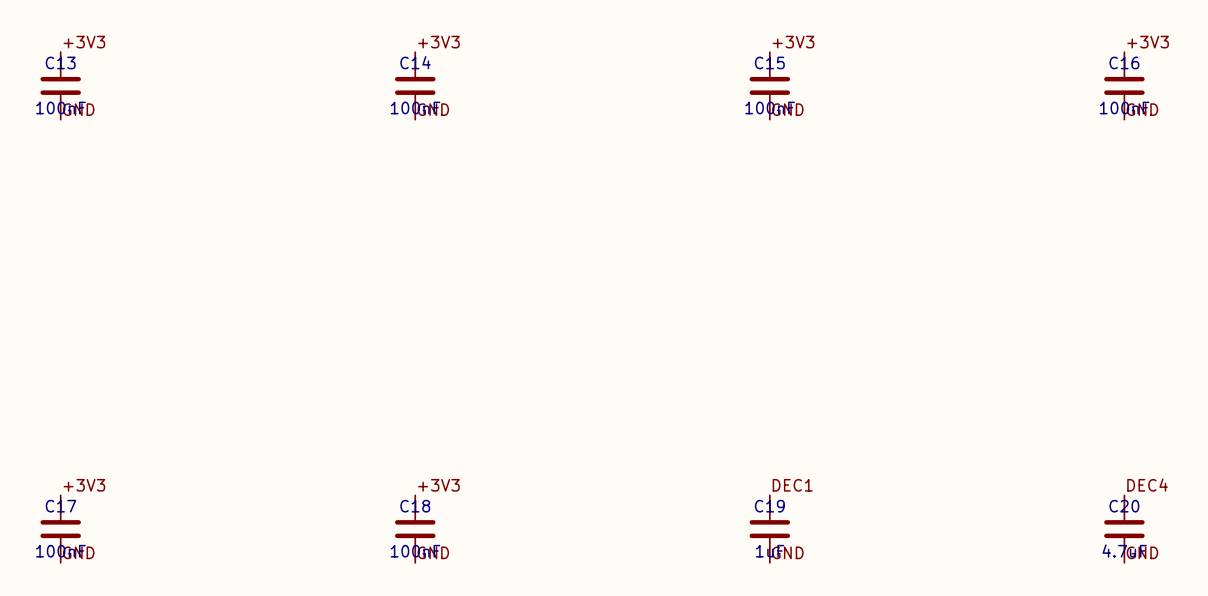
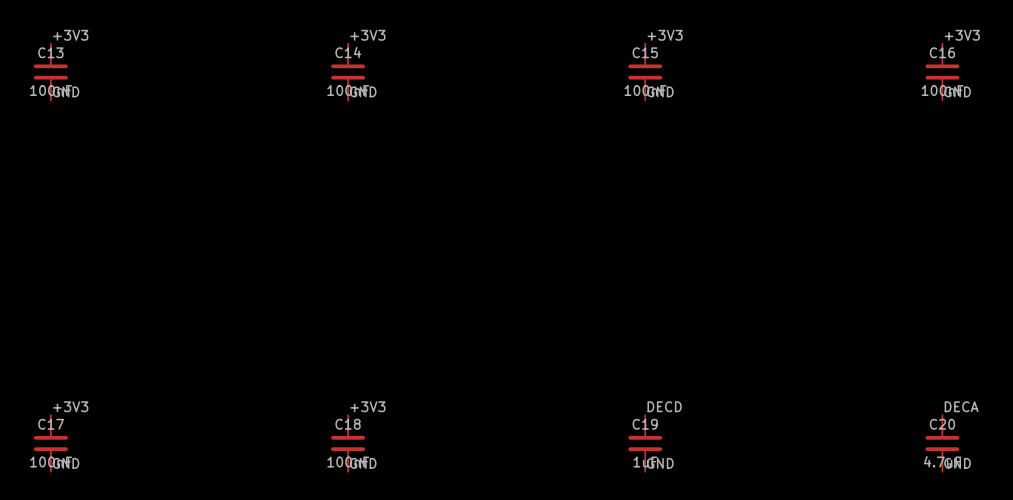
label: DEC1 (792, 485) -> DECD (664, 406)
label: DEC4 (1147, 485) -> DECA (961, 406)

